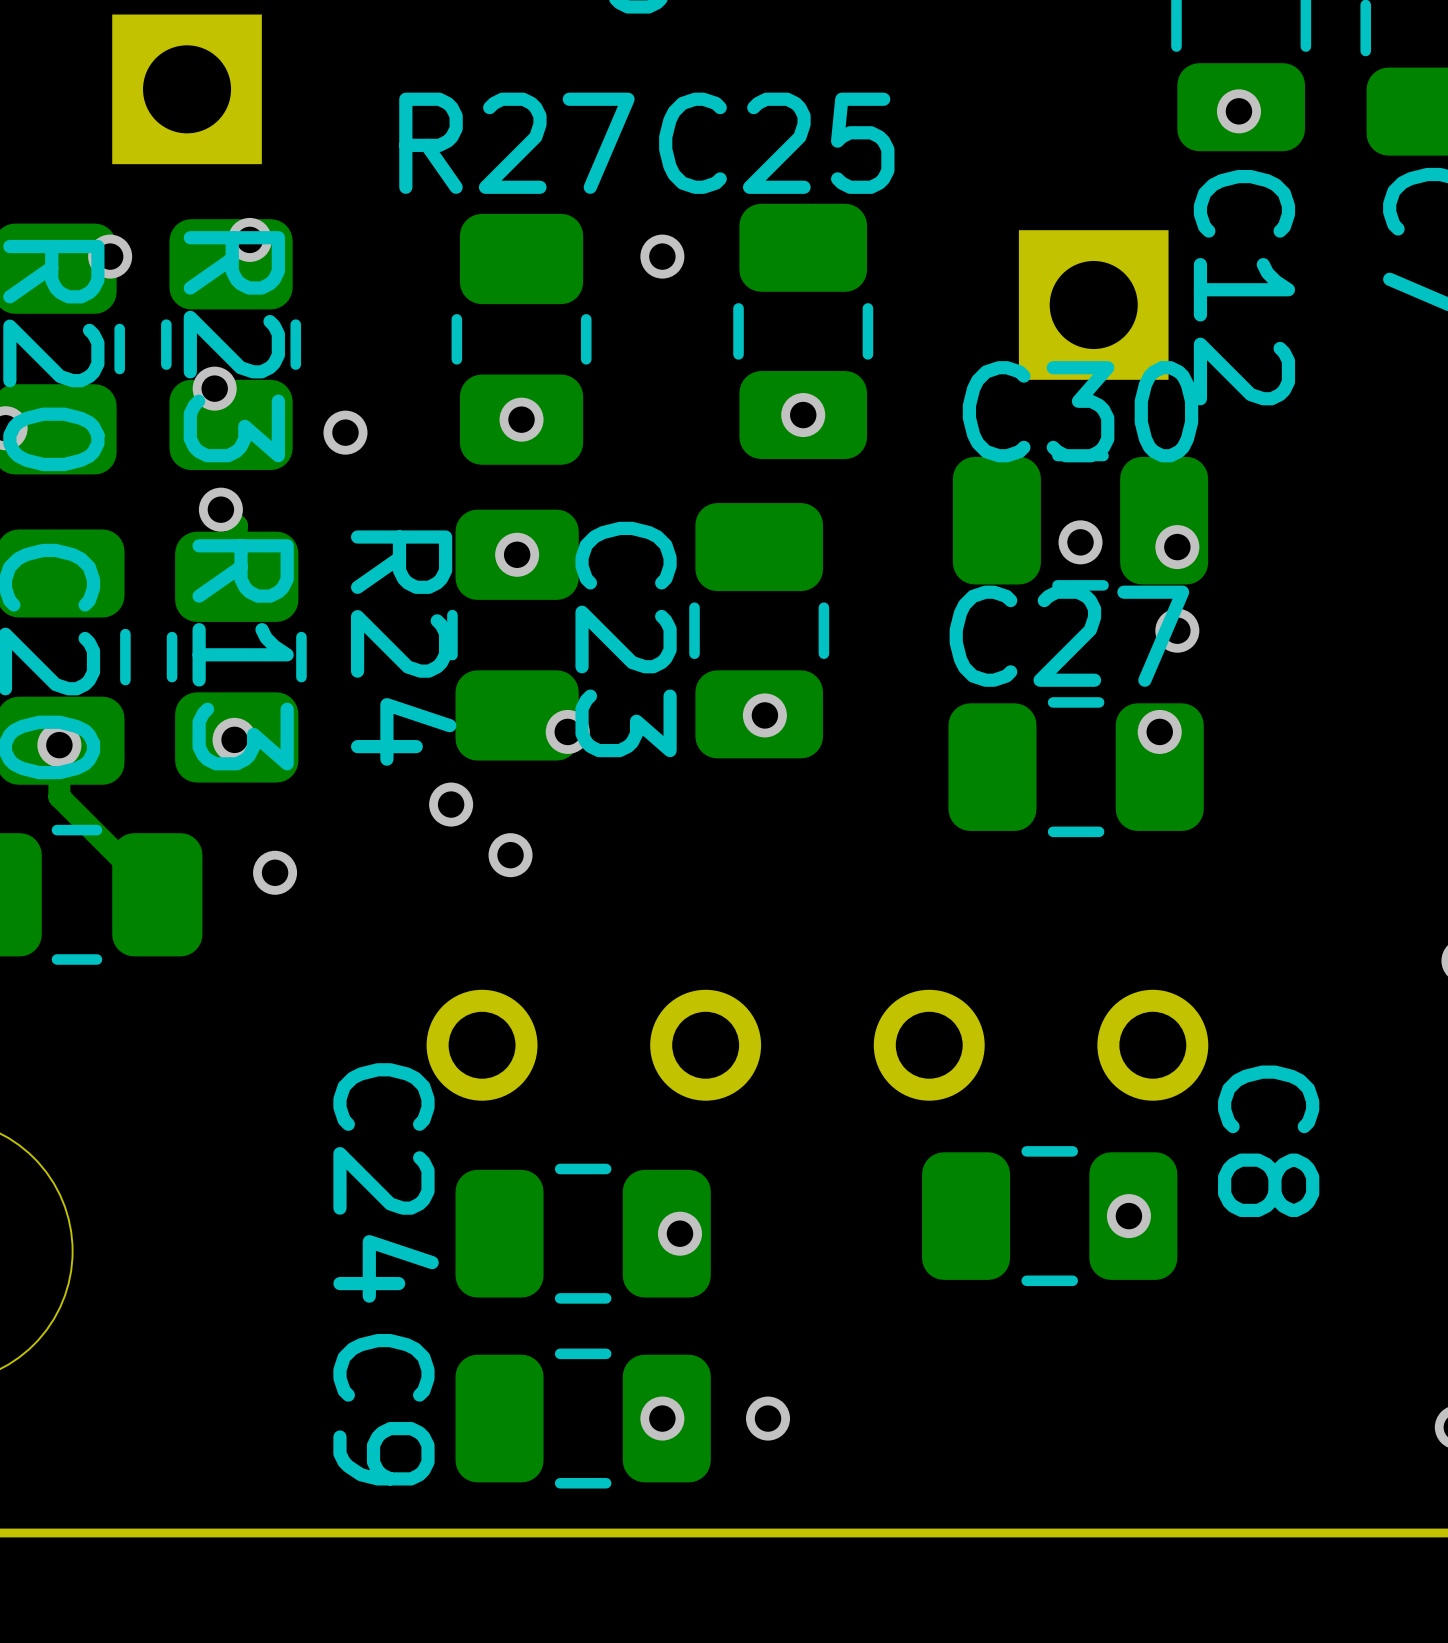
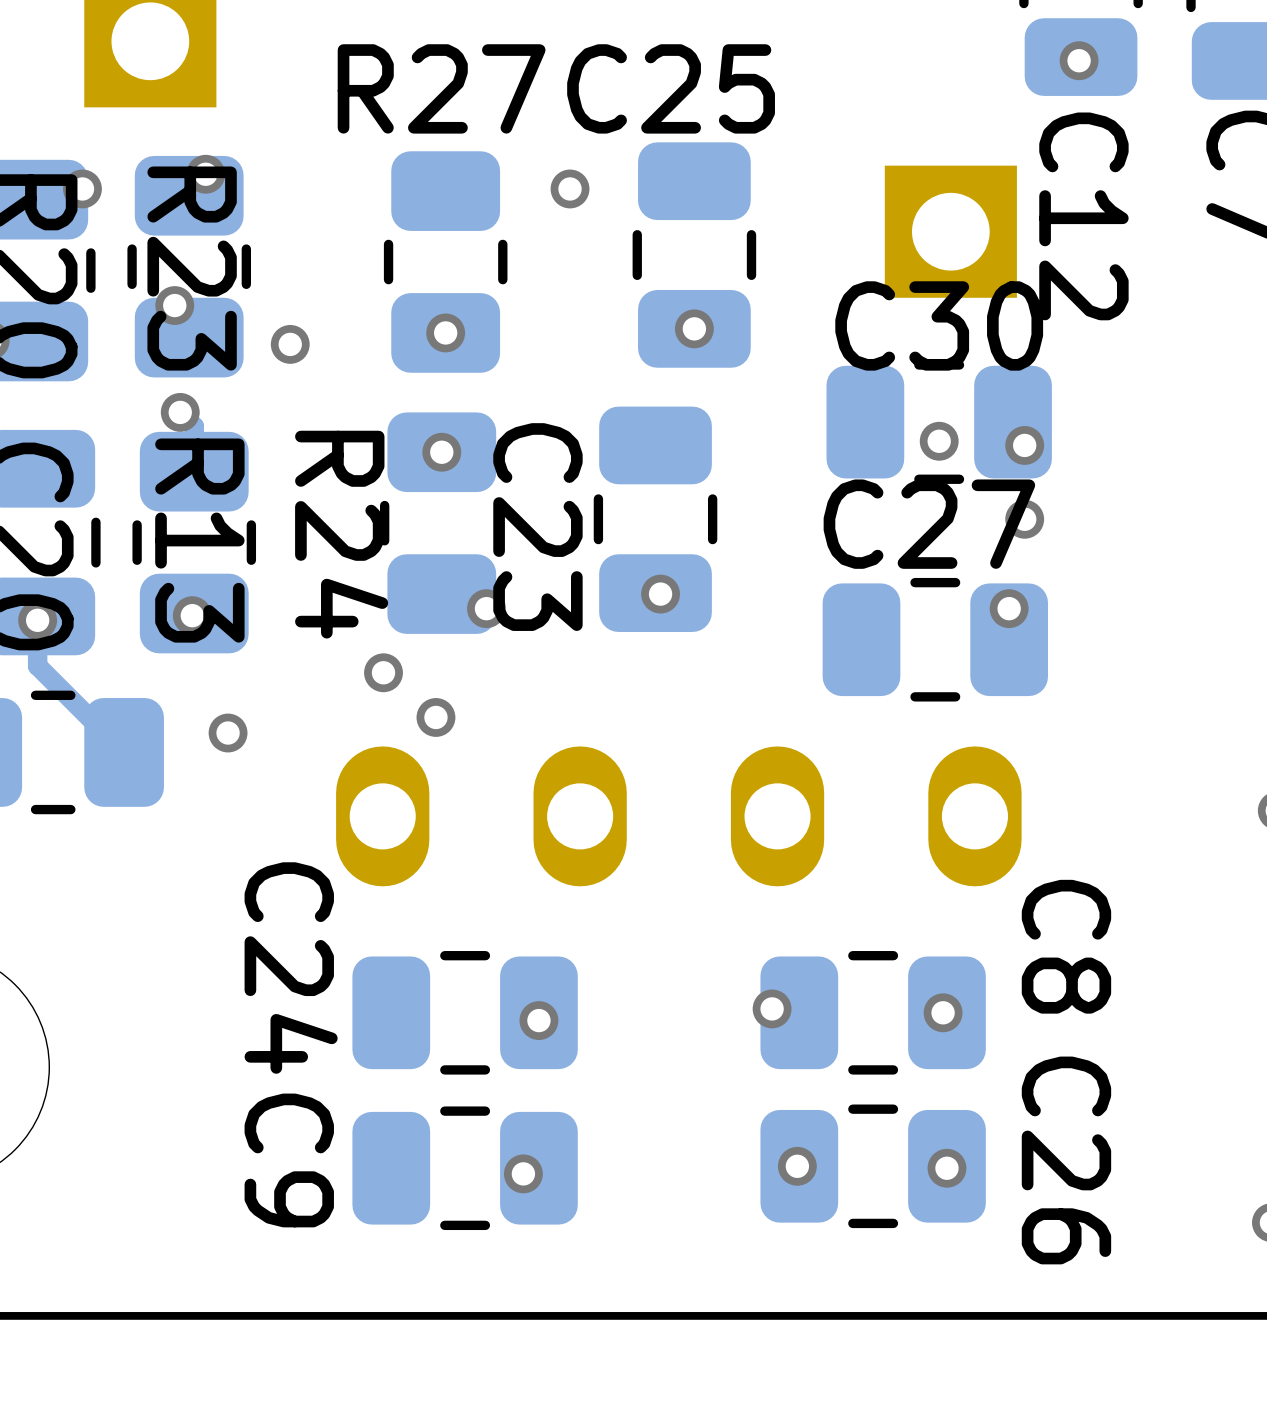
part footprint: [426, 989, 1209, 1101] -> [336, 746, 1022, 887]
via: none -> (772, 1008)
C8 position: (1049, 1216) -> (873, 1012)
via position: (1128, 1216) -> (943, 1012)
C24 position: (583, 1233) -> (465, 1012)
via position: (679, 1233) -> (538, 1020)
via: none -> (797, 1166)
C26: none -> (873, 1166)
via: none -> (946, 1168)
C9 position: (583, 1418) -> (465, 1168)
via position: (662, 1418) -> (523, 1173)
via: (768, 1418) -> none

